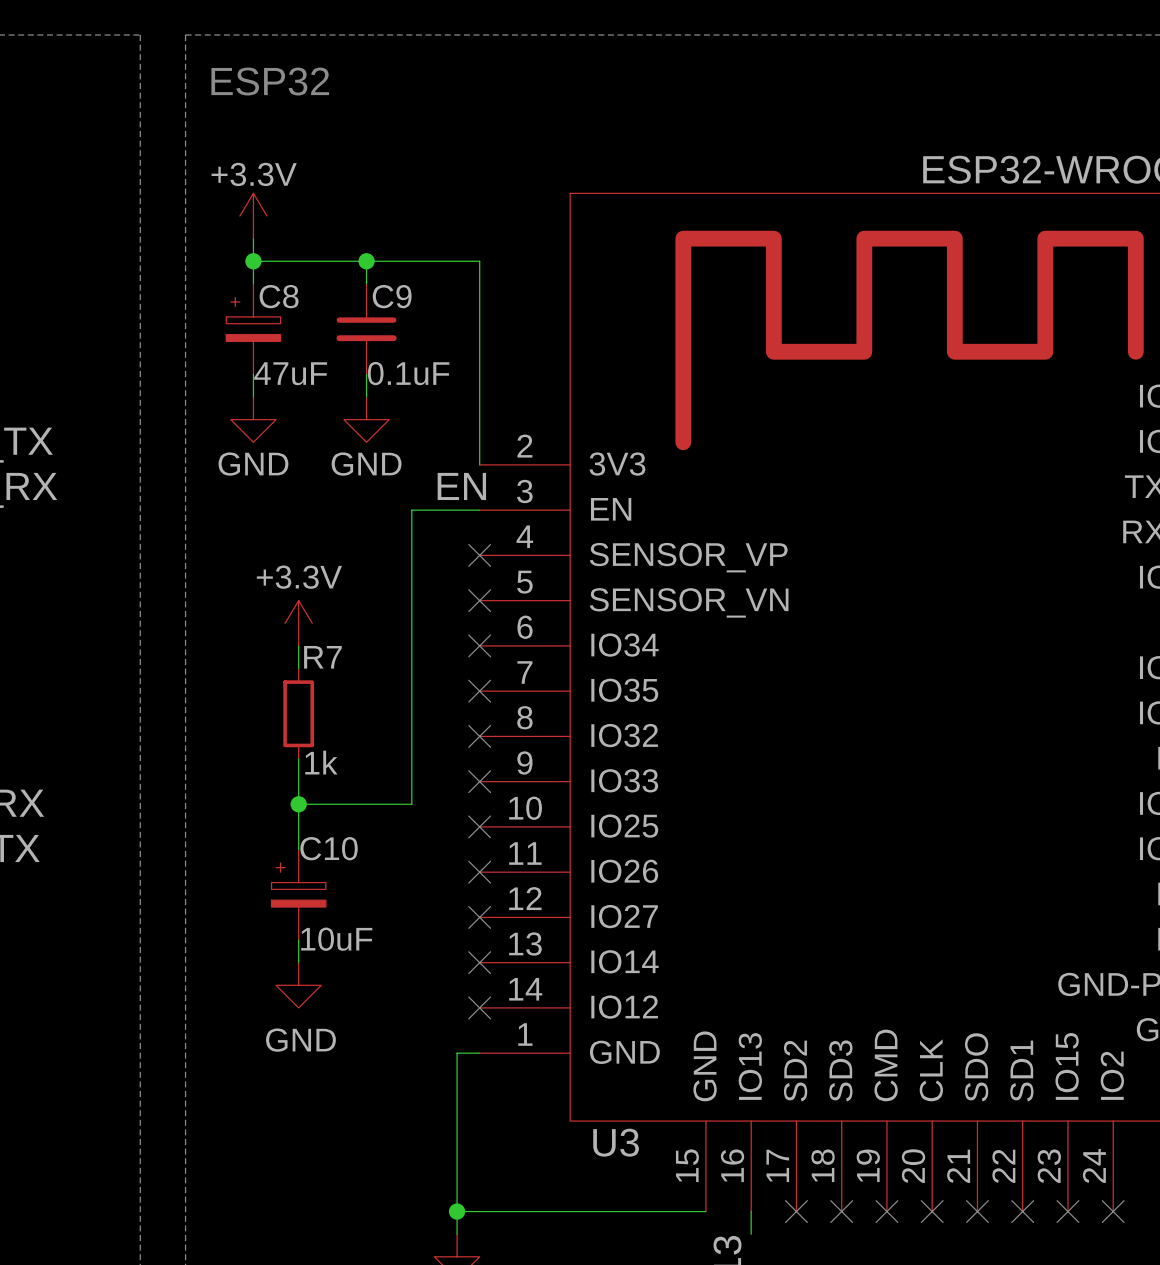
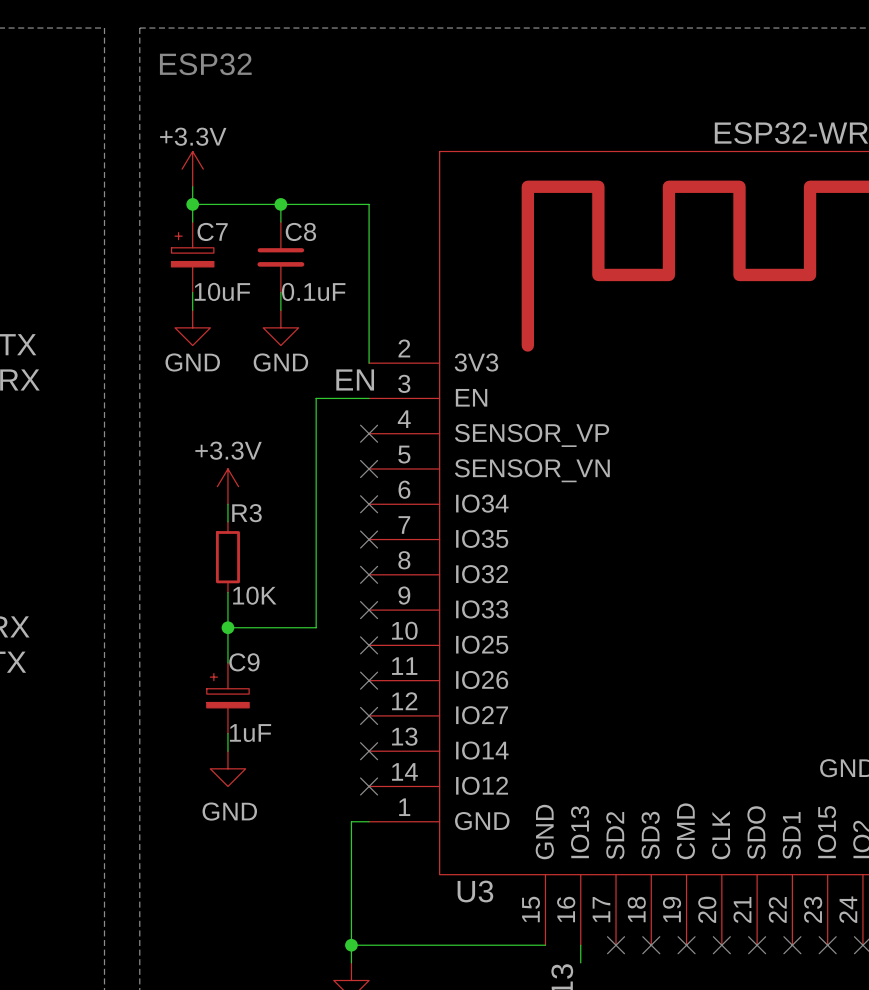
C8 name: C8 (279, 296) -> C7 (212, 231)
C9 name: C9 (392, 296) -> C8 (300, 231)
C8 value: 47uF (290, 373) -> 10uF (222, 291)
R7 name: R7 (322, 657) -> R3 (246, 513)
R7 value: 1k (321, 762) -> 10K (254, 595)
C10 name: C10 (329, 848) -> C9 (244, 662)
C10 value: 10uF (336, 939) -> 1uF (250, 733)

